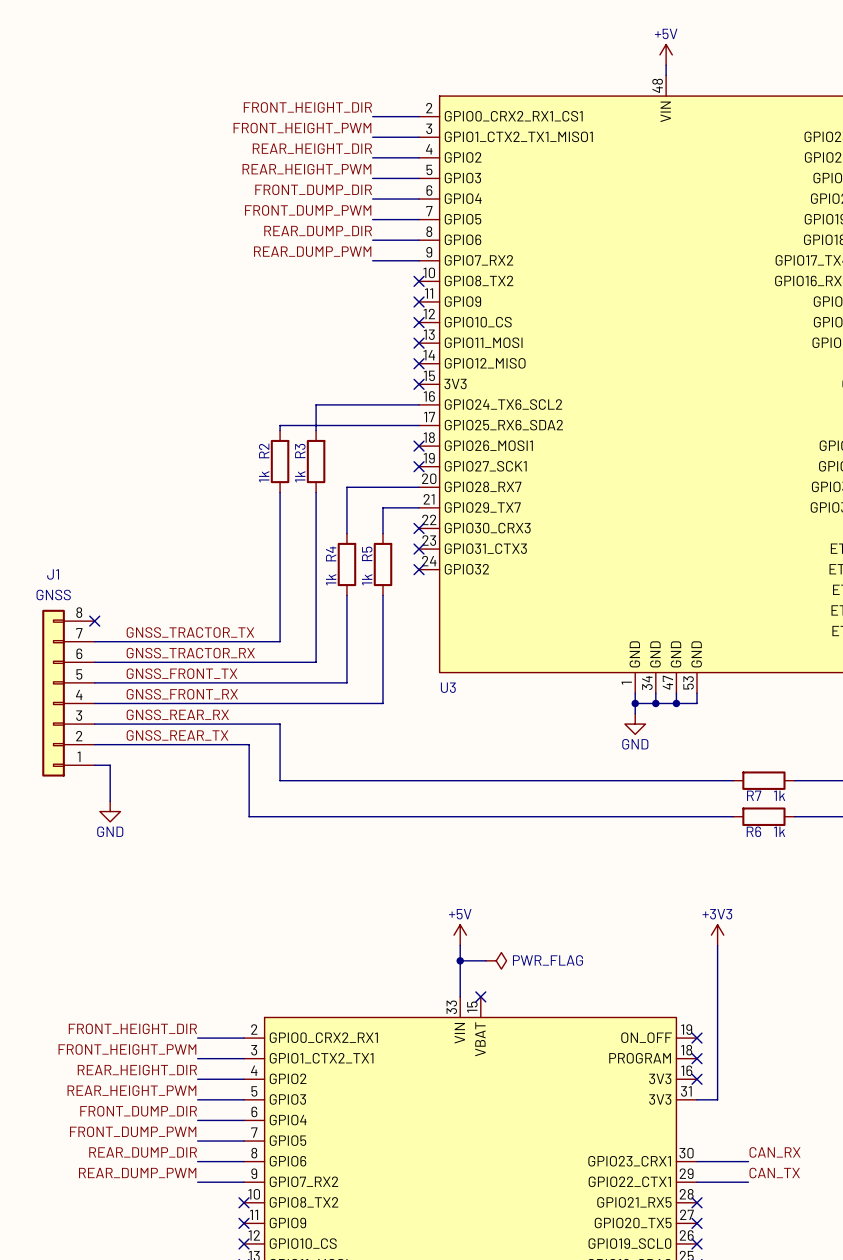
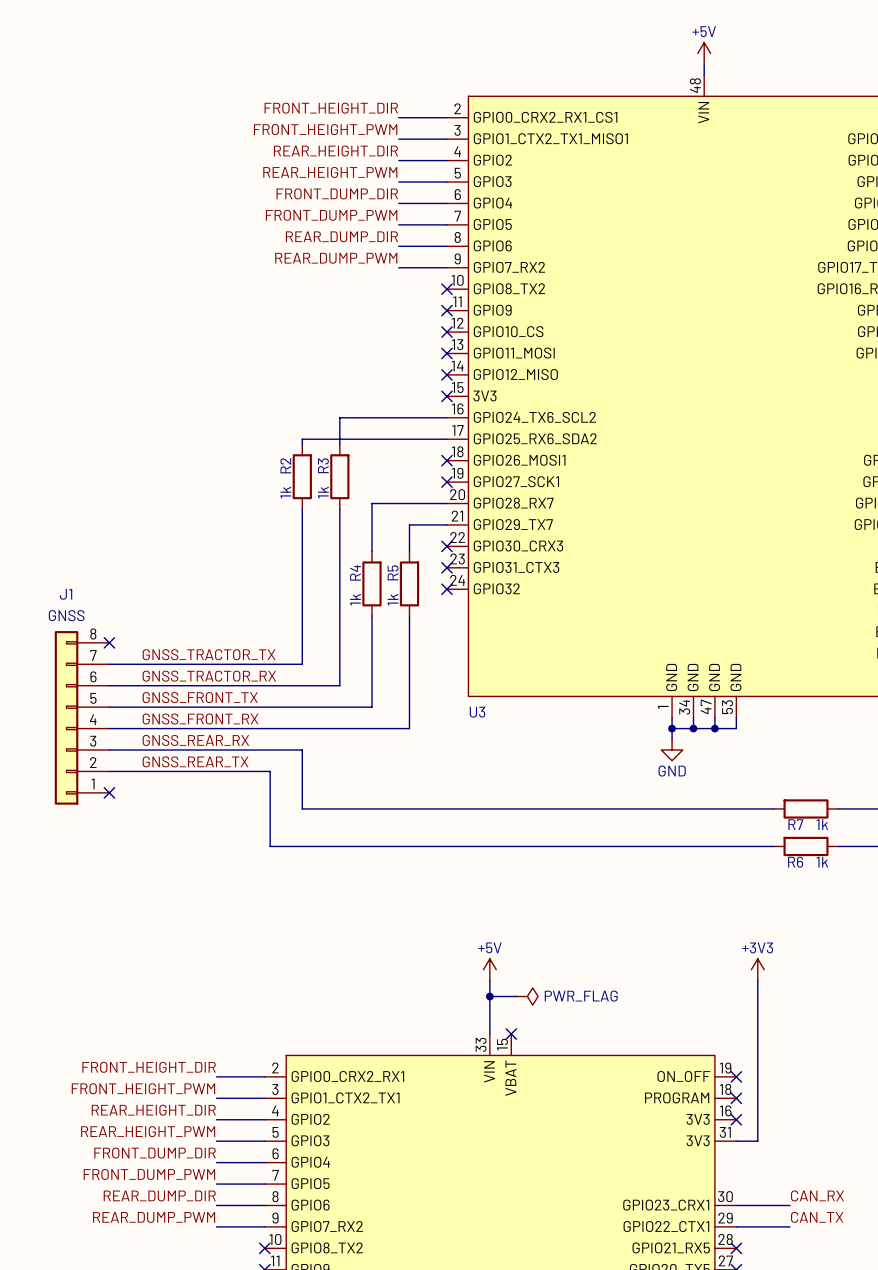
wire: (94, 765) (110, 765) (110, 801) -> none
no-connect mark: none -> (109, 792)
power symbol: GND (110, 811) -> none

